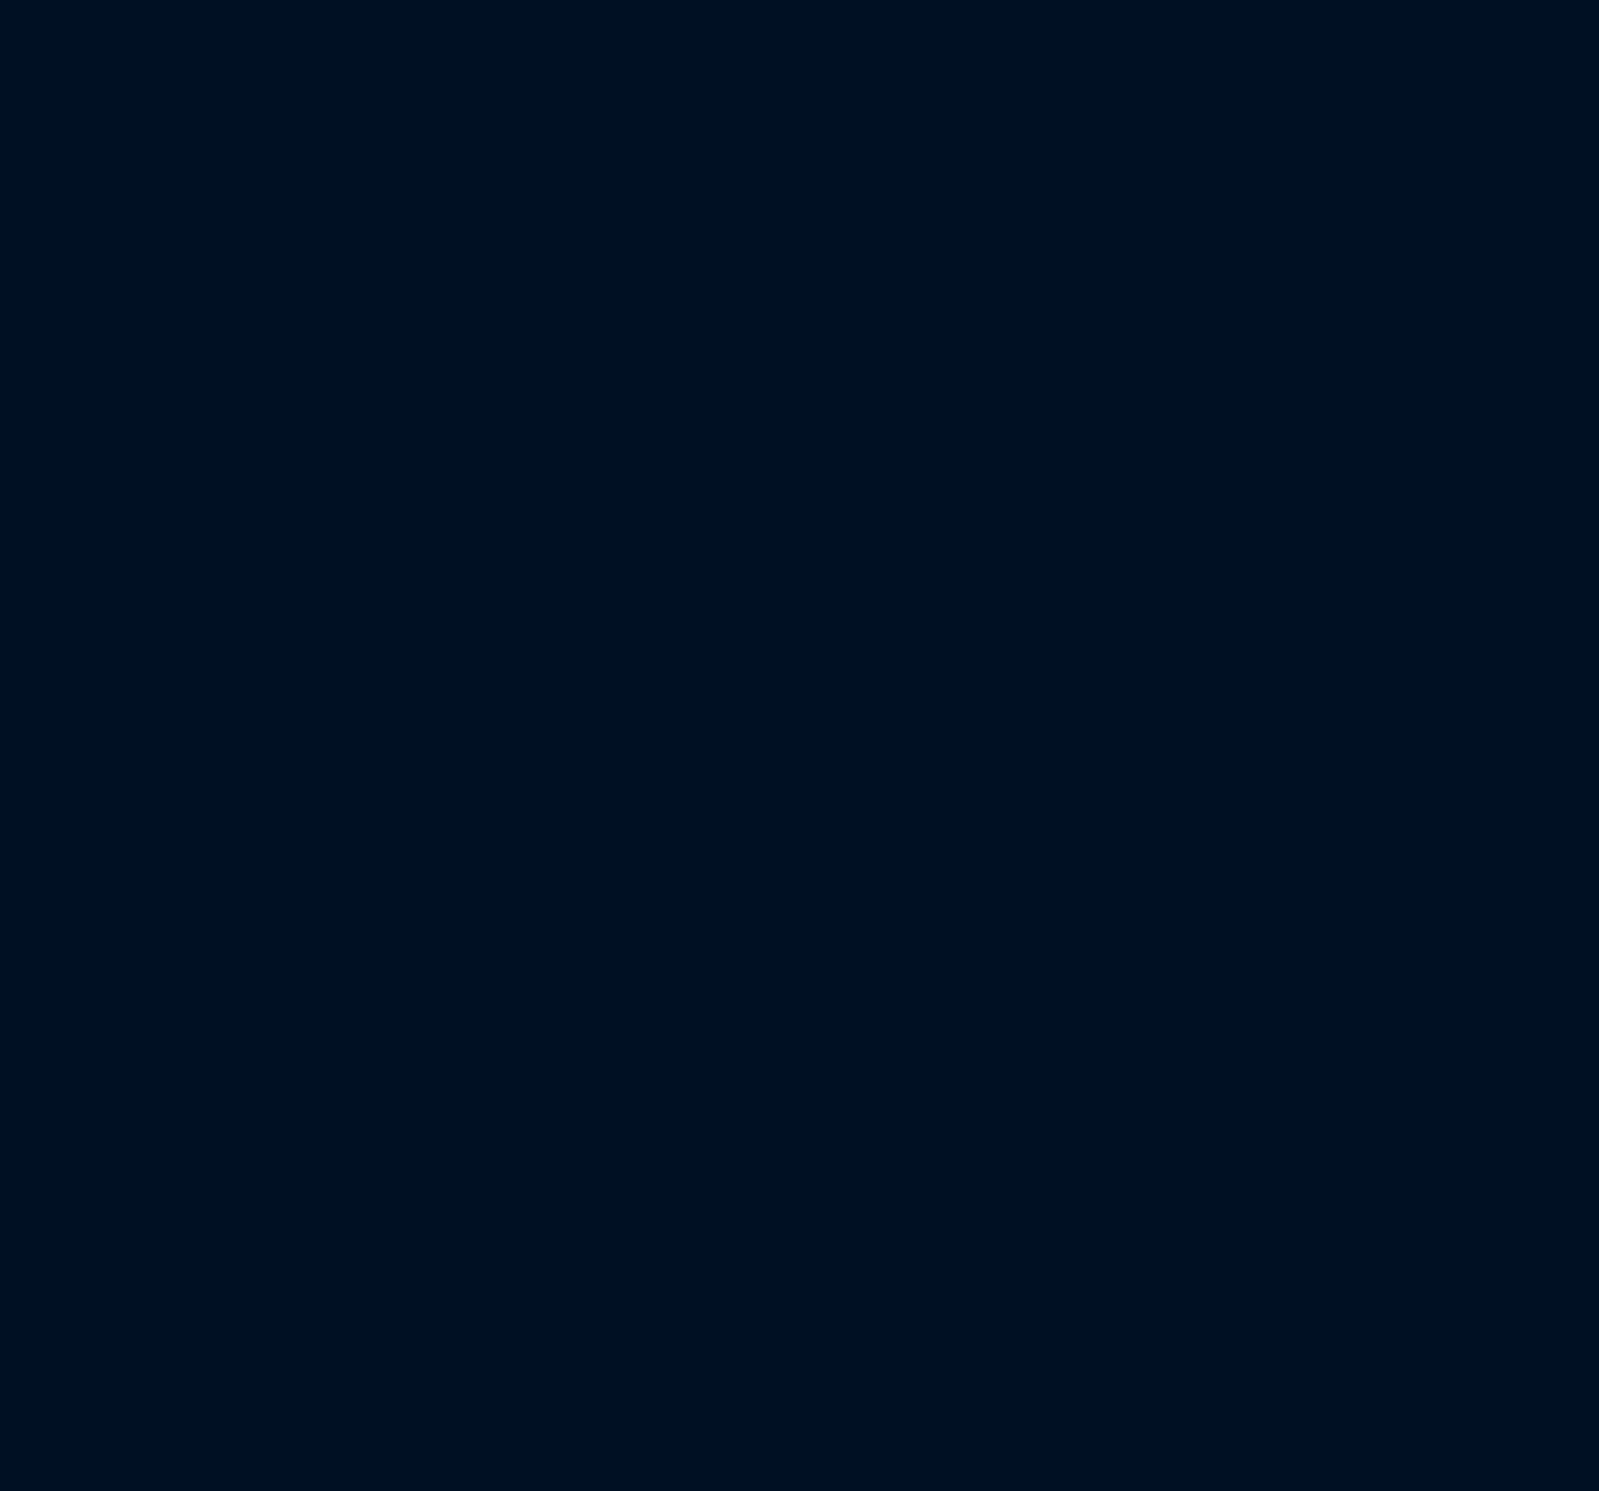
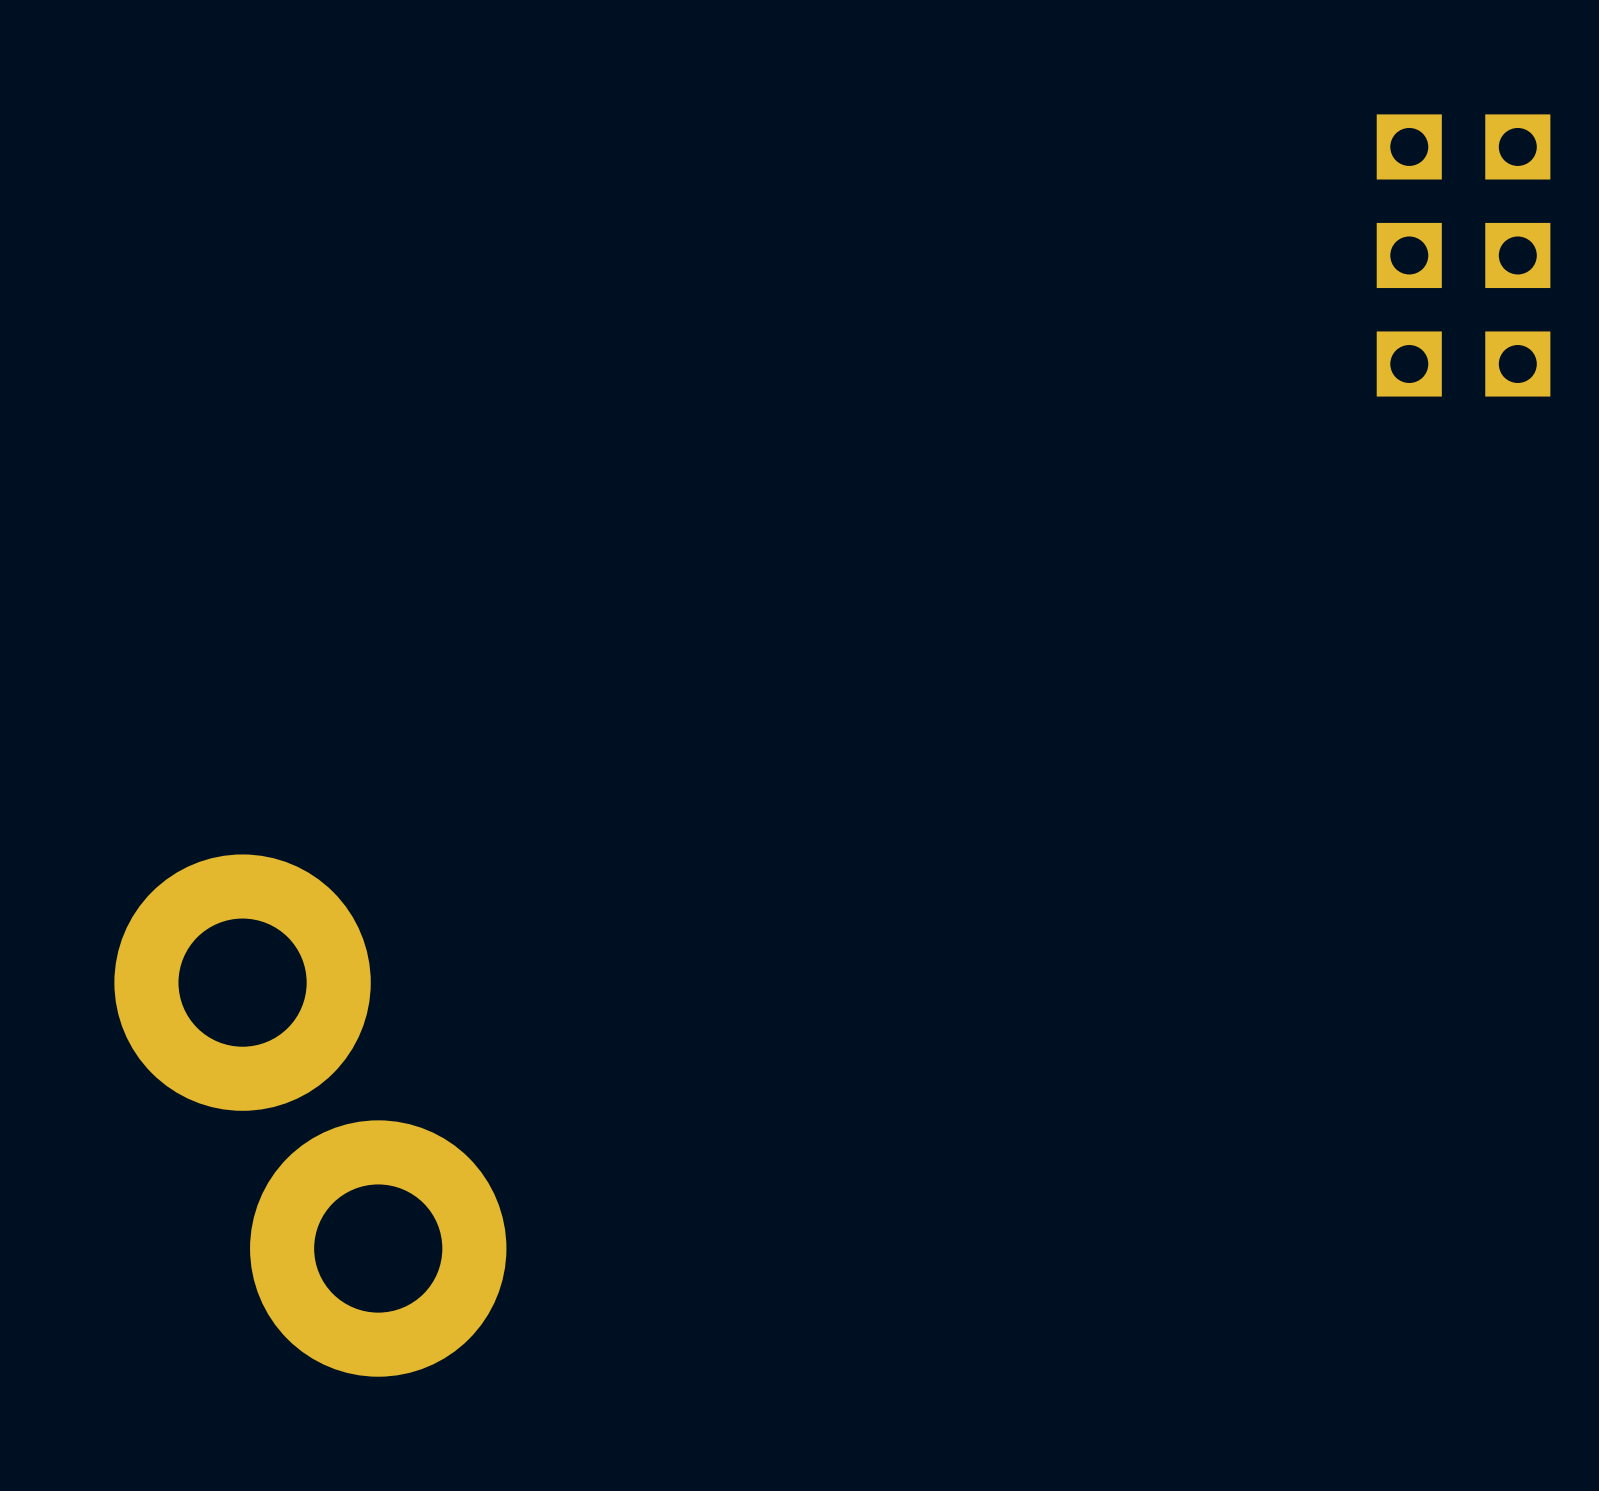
part: none -> (1463, 255)
part: none -> (242, 982)
part: none -> (378, 1248)

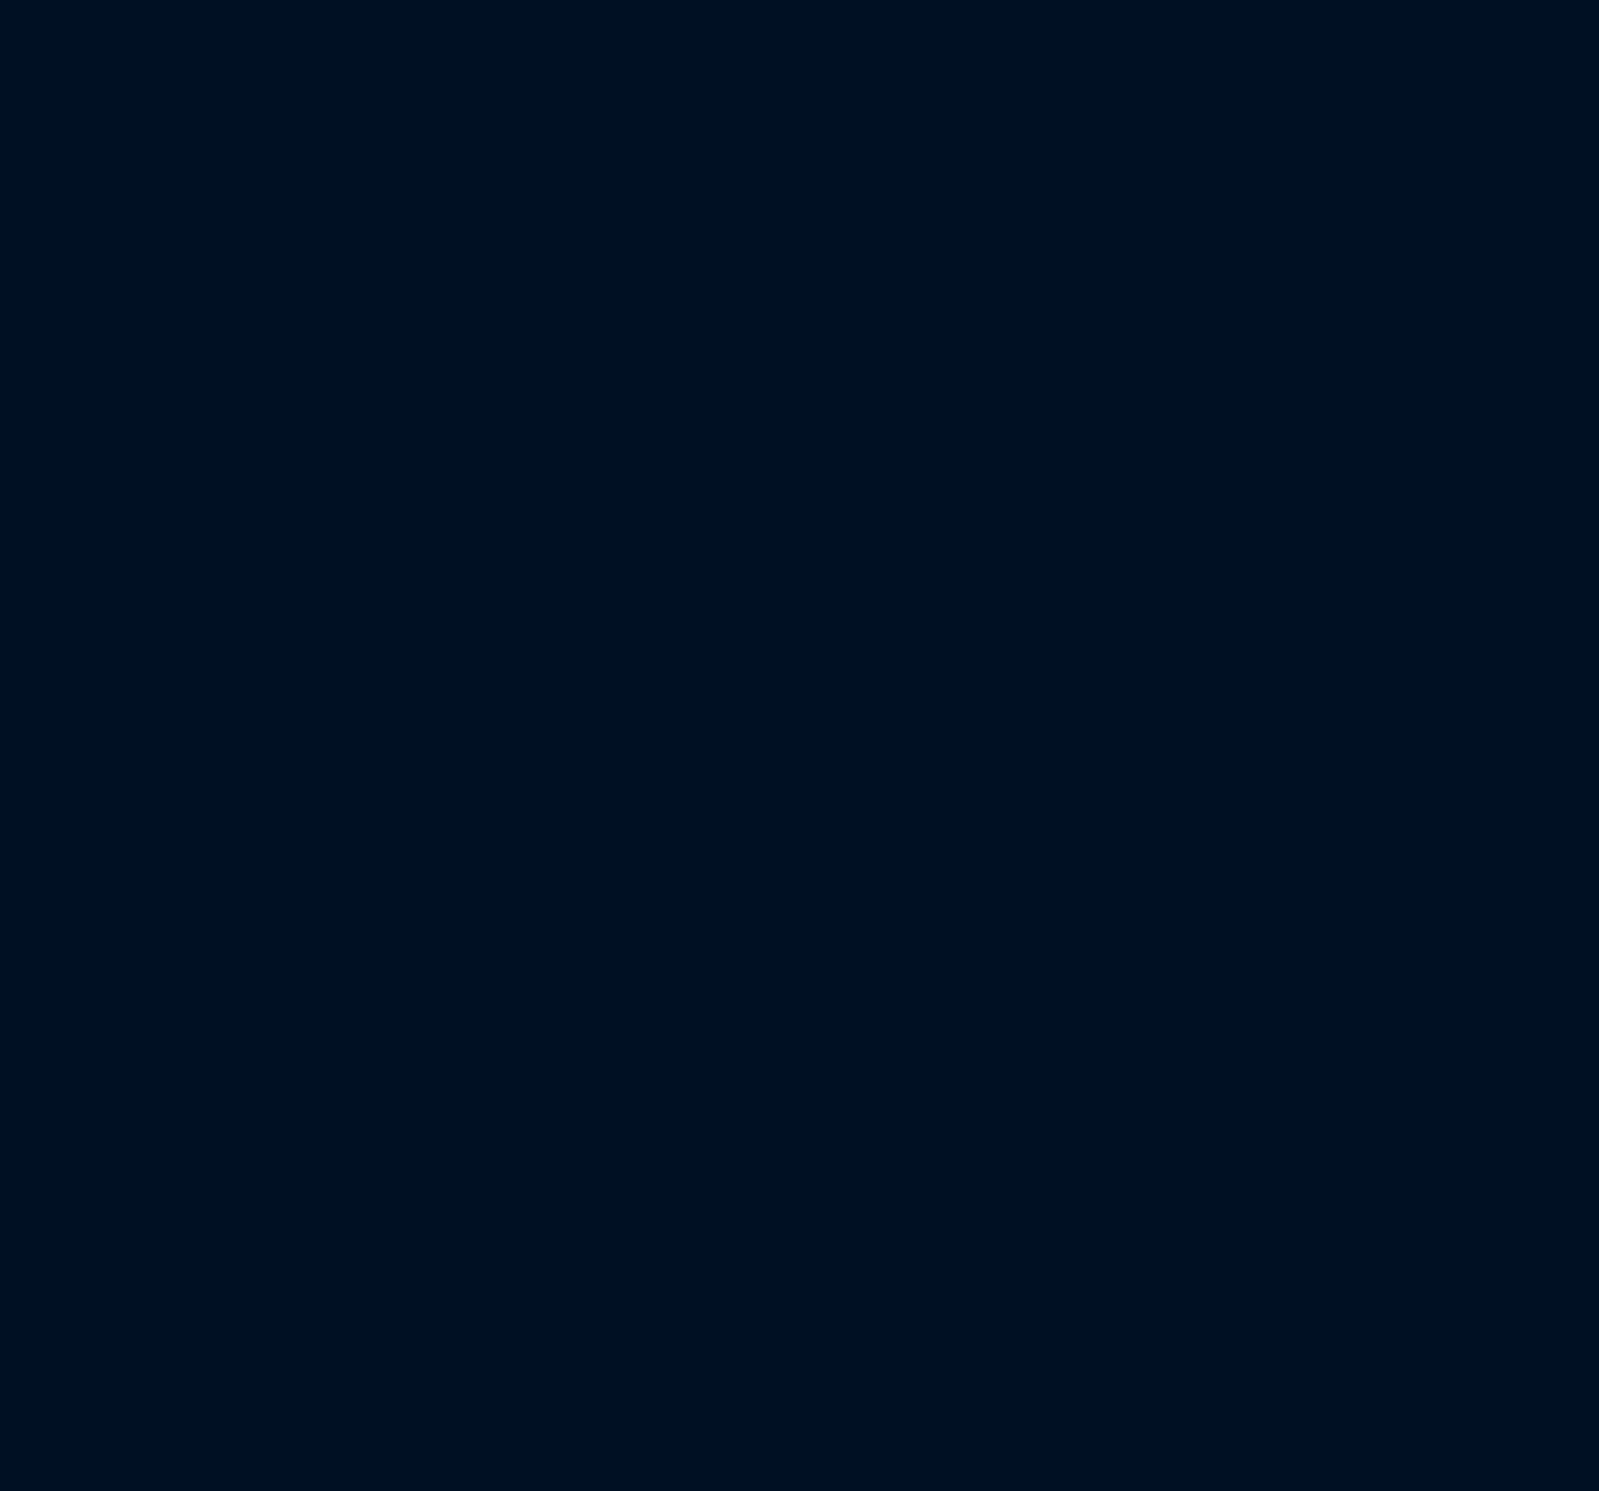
part: (1463, 255) -> none
part: (242, 982) -> none
part: (378, 1248) -> none

